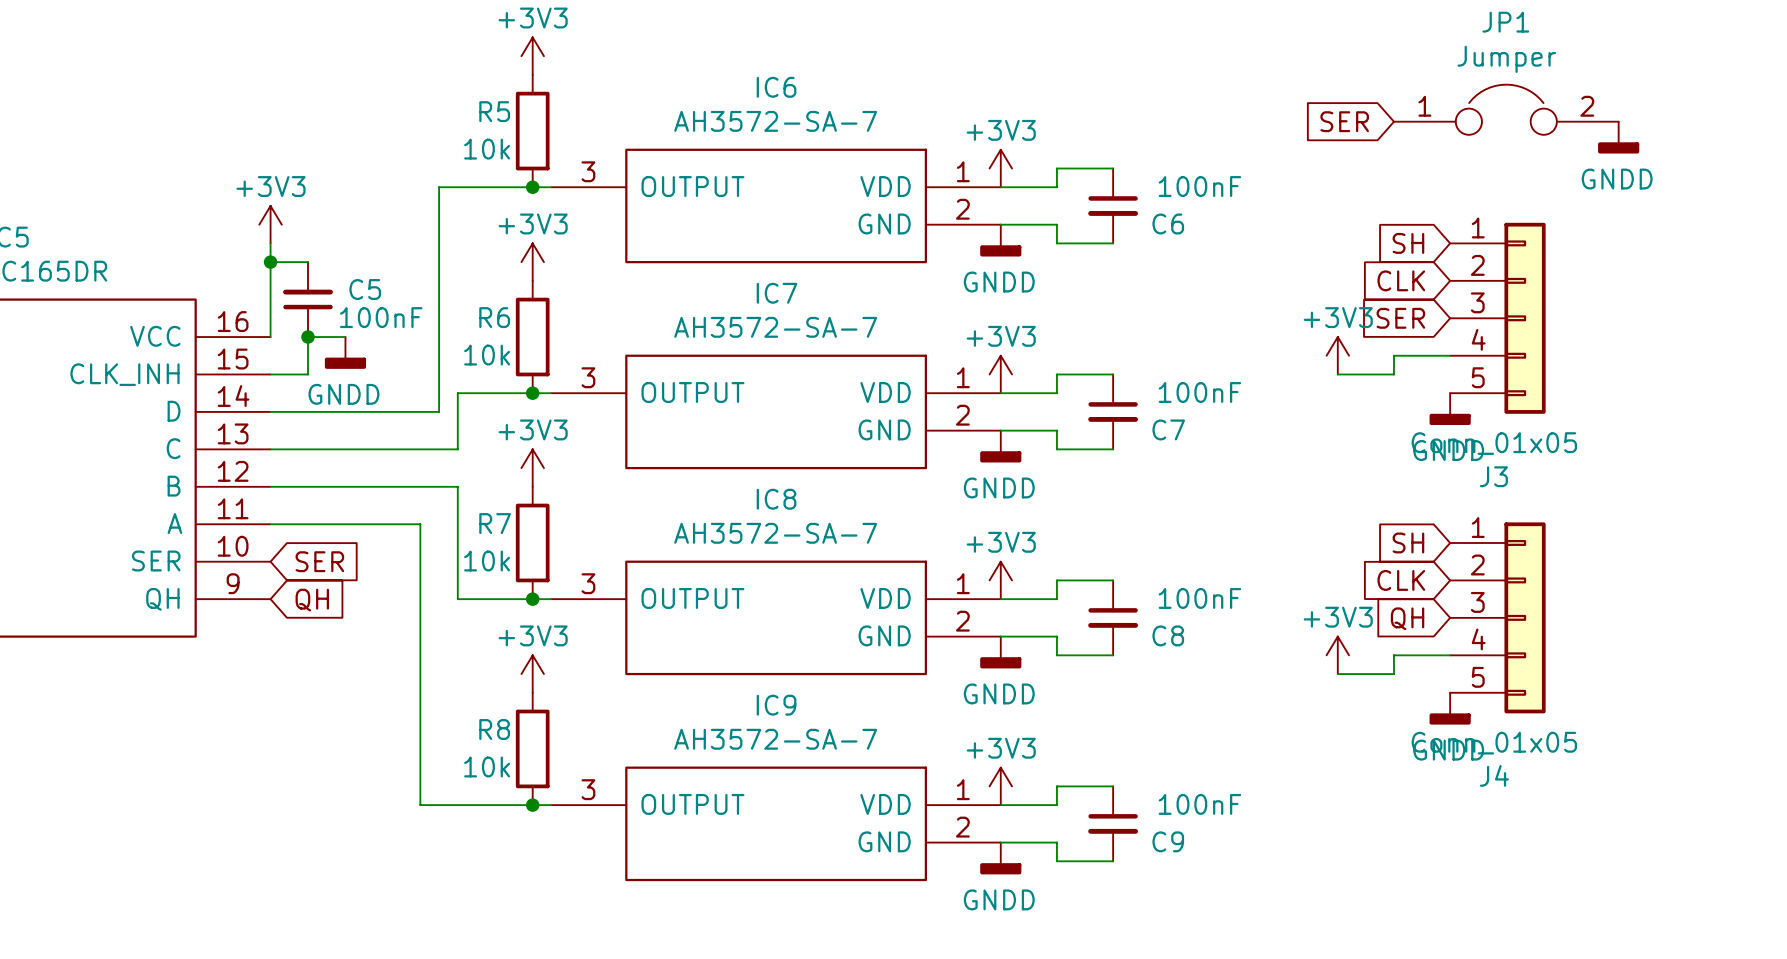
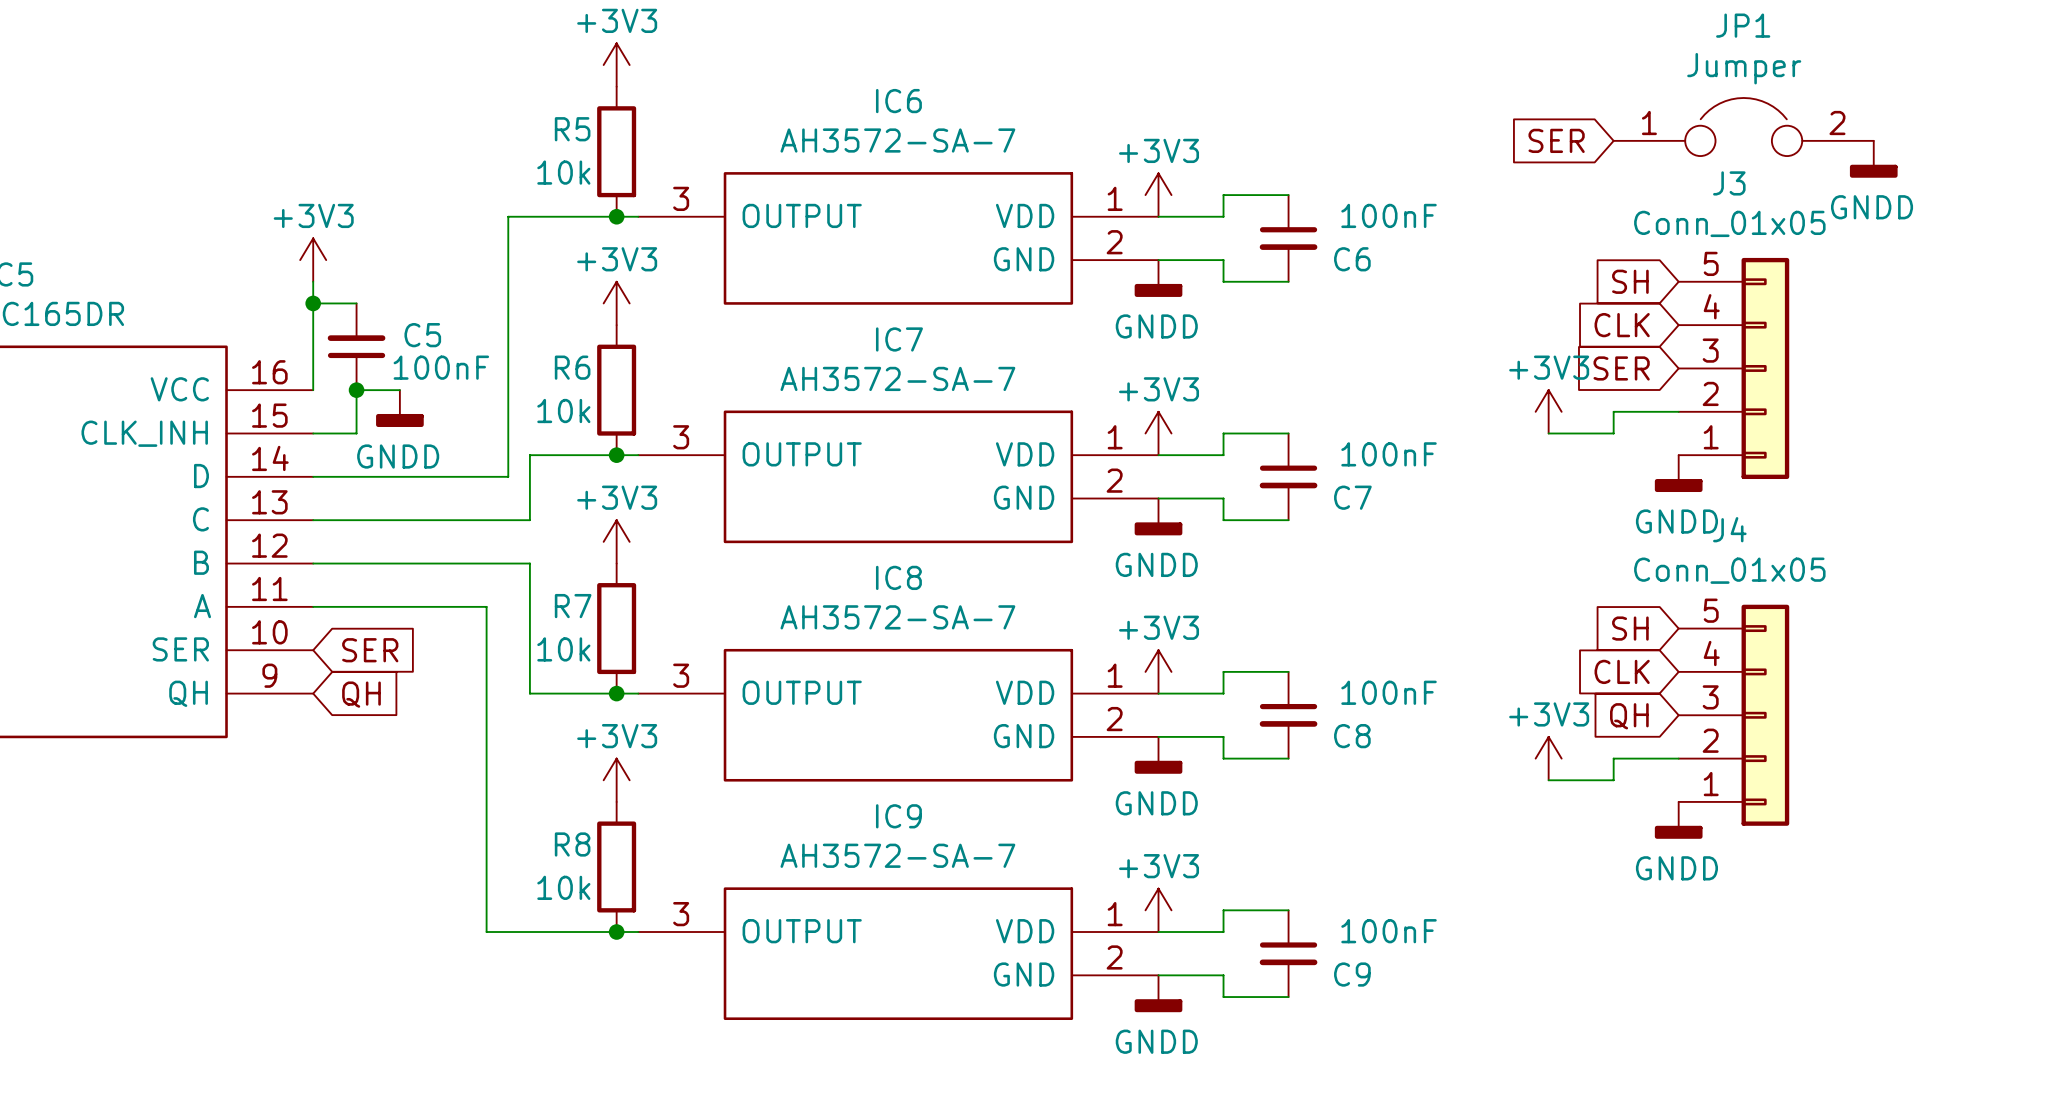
J3 flip: as is (1525, 318) -> up-down (1765, 368)
J4 flip: as is (1525, 617) -> up-down (1765, 715)

